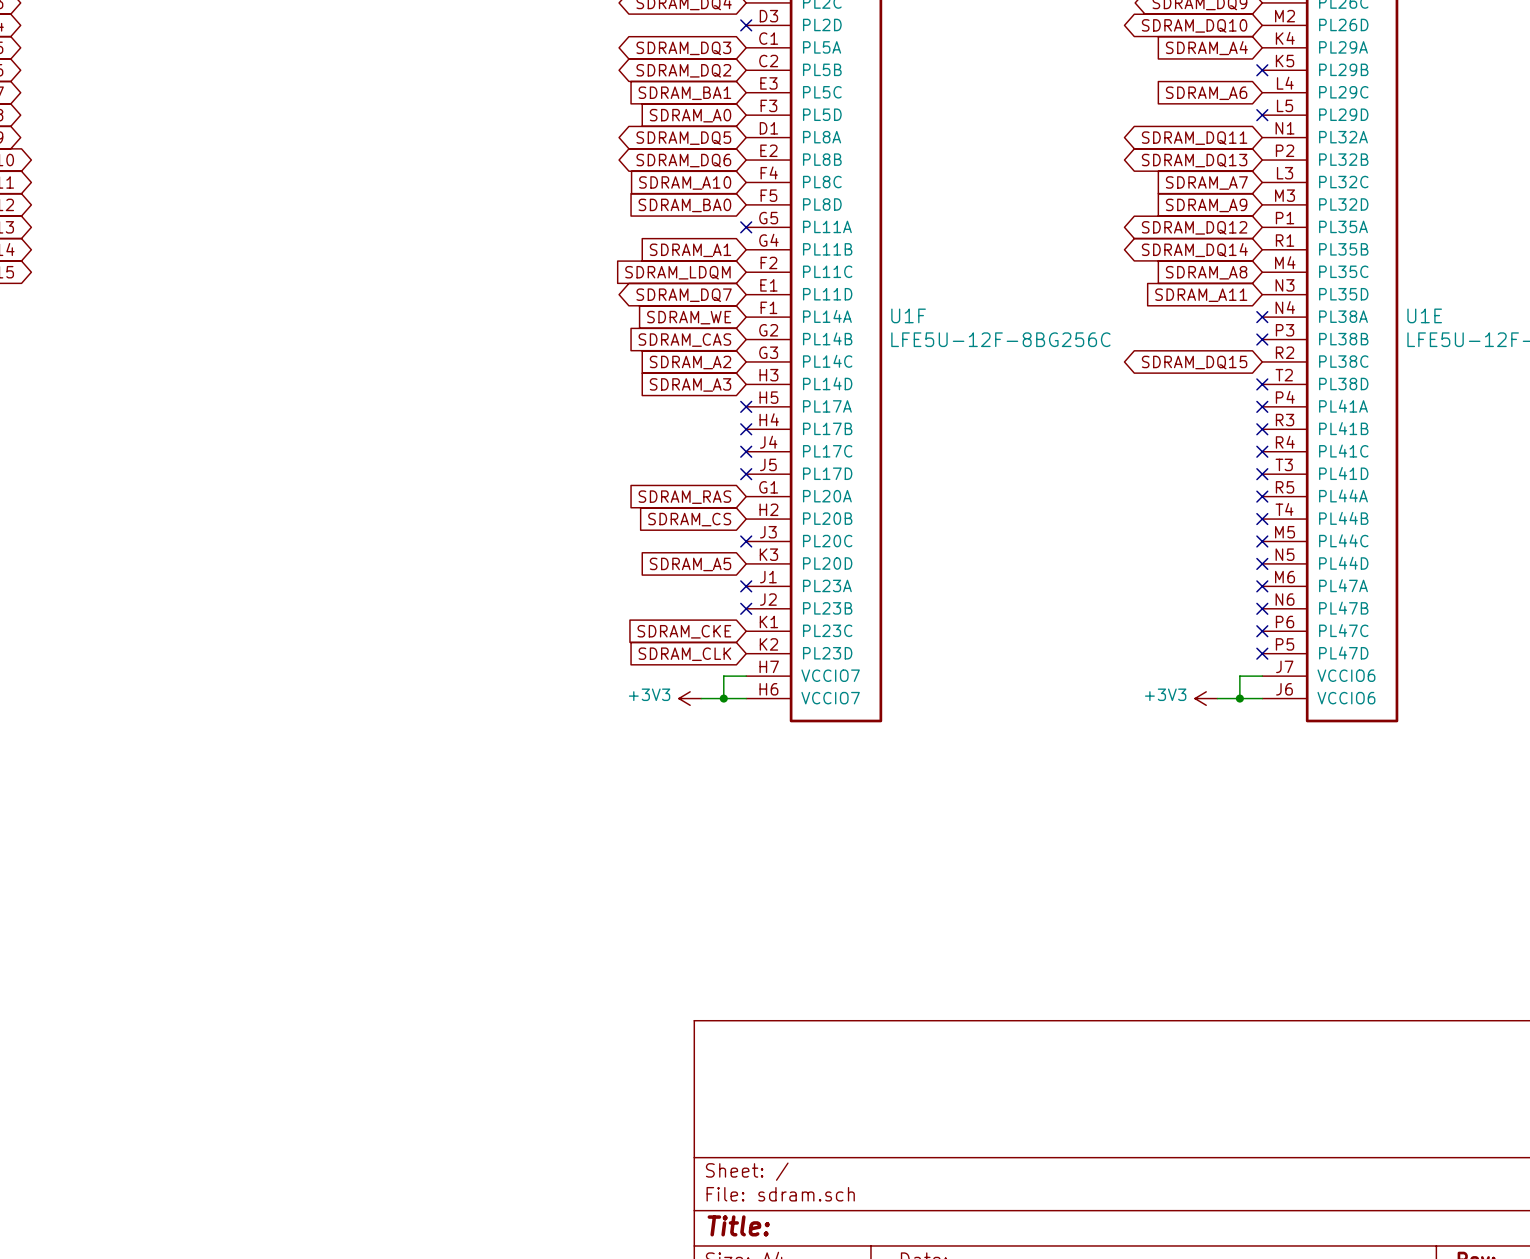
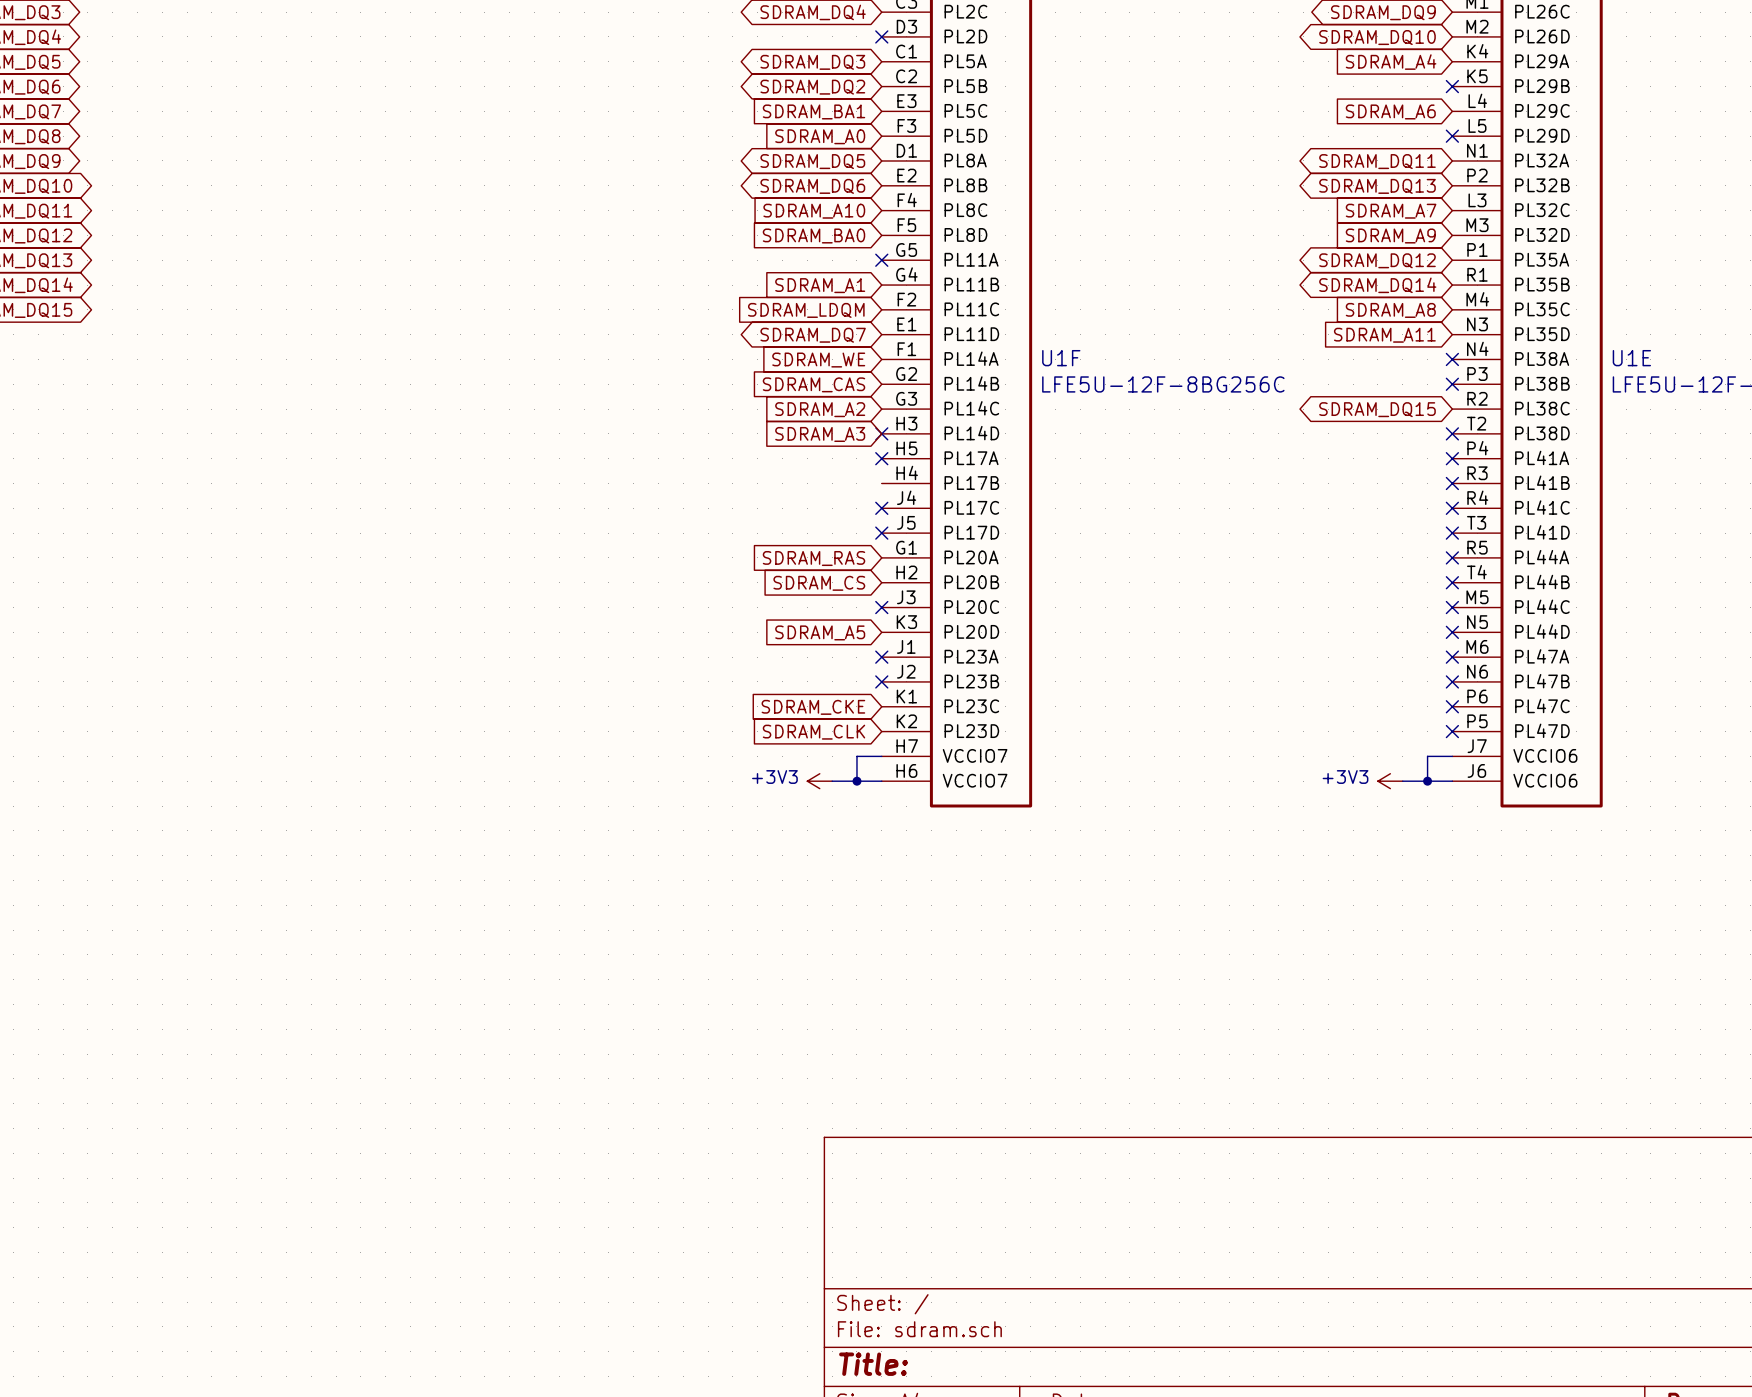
no-connect mark position: (746, 429) -> (881, 433)

